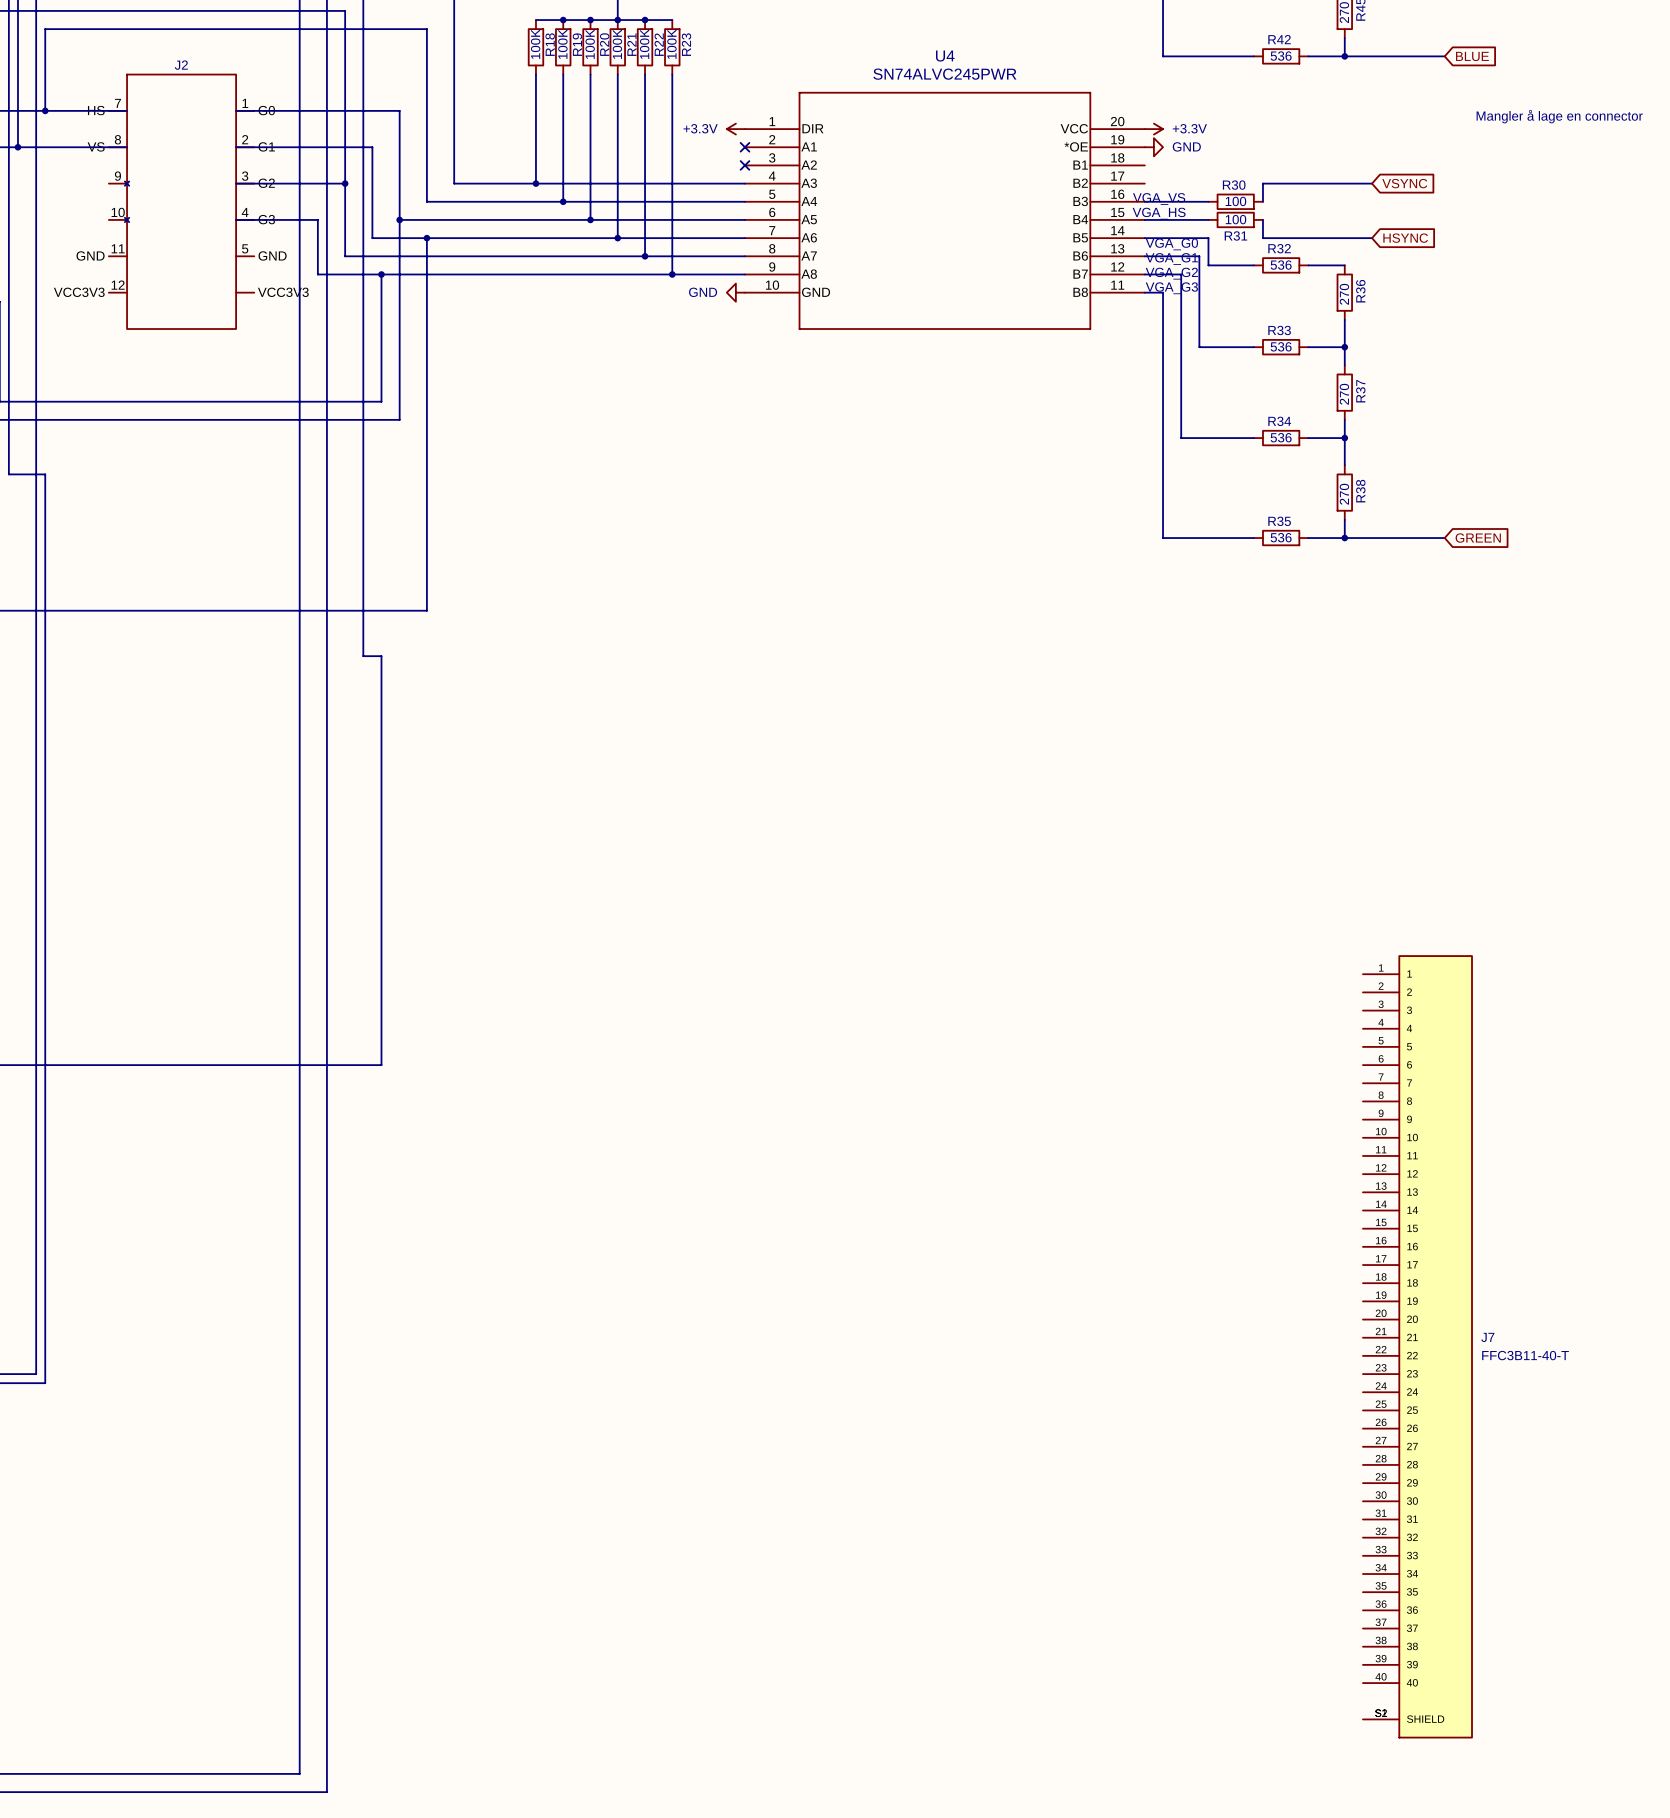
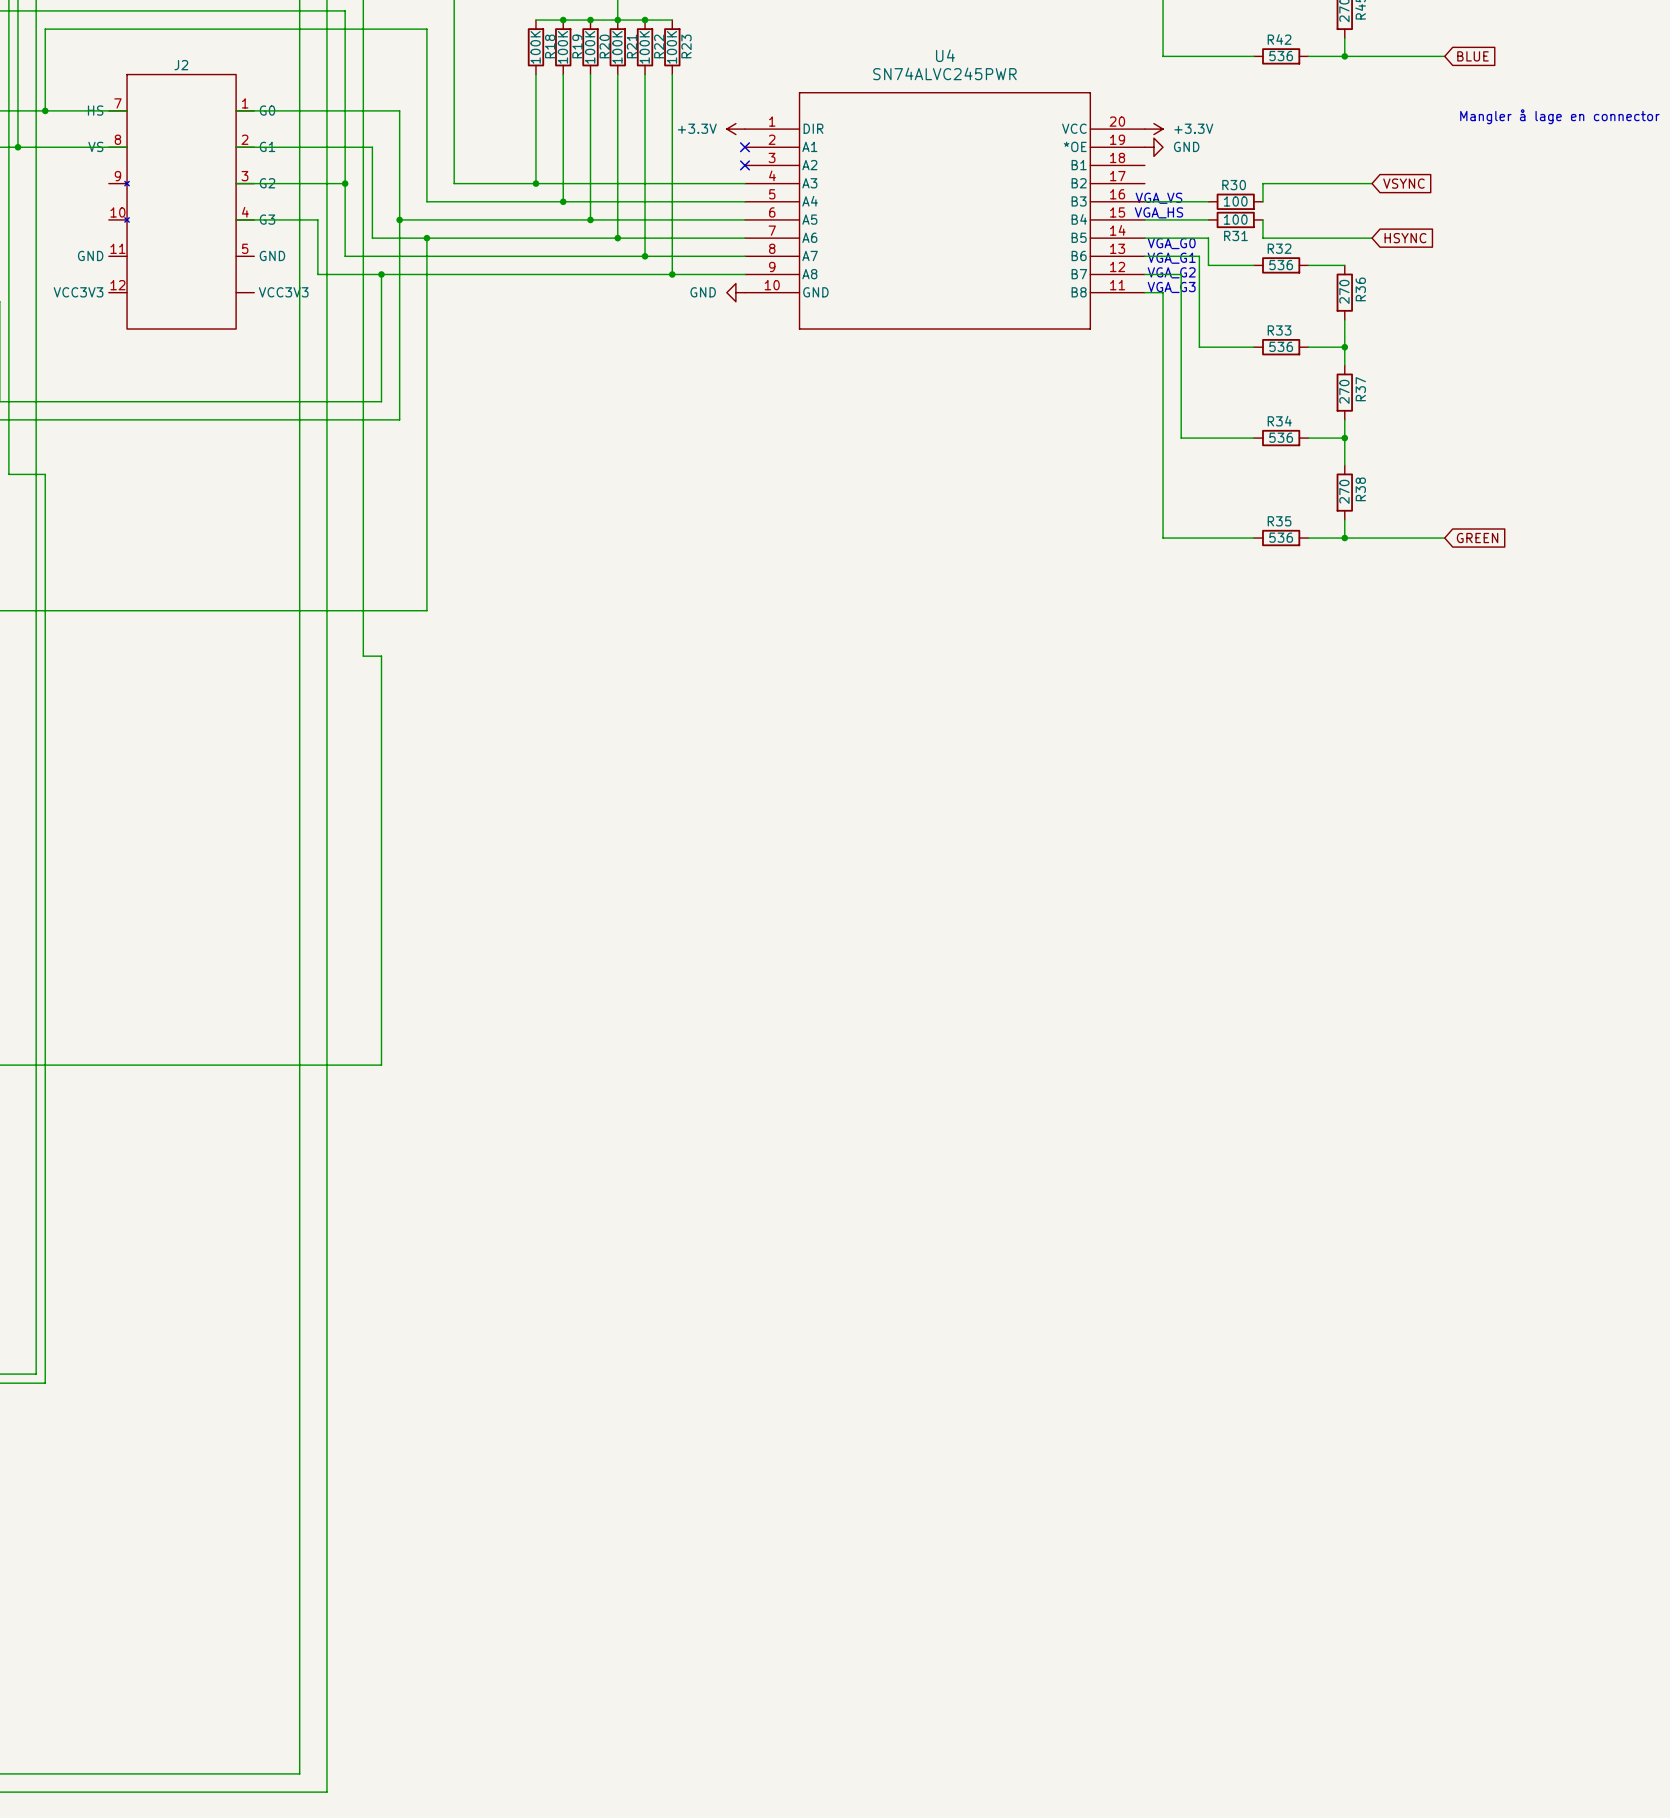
J7: FFC3B11-40-T (1417, 1346) -> none

